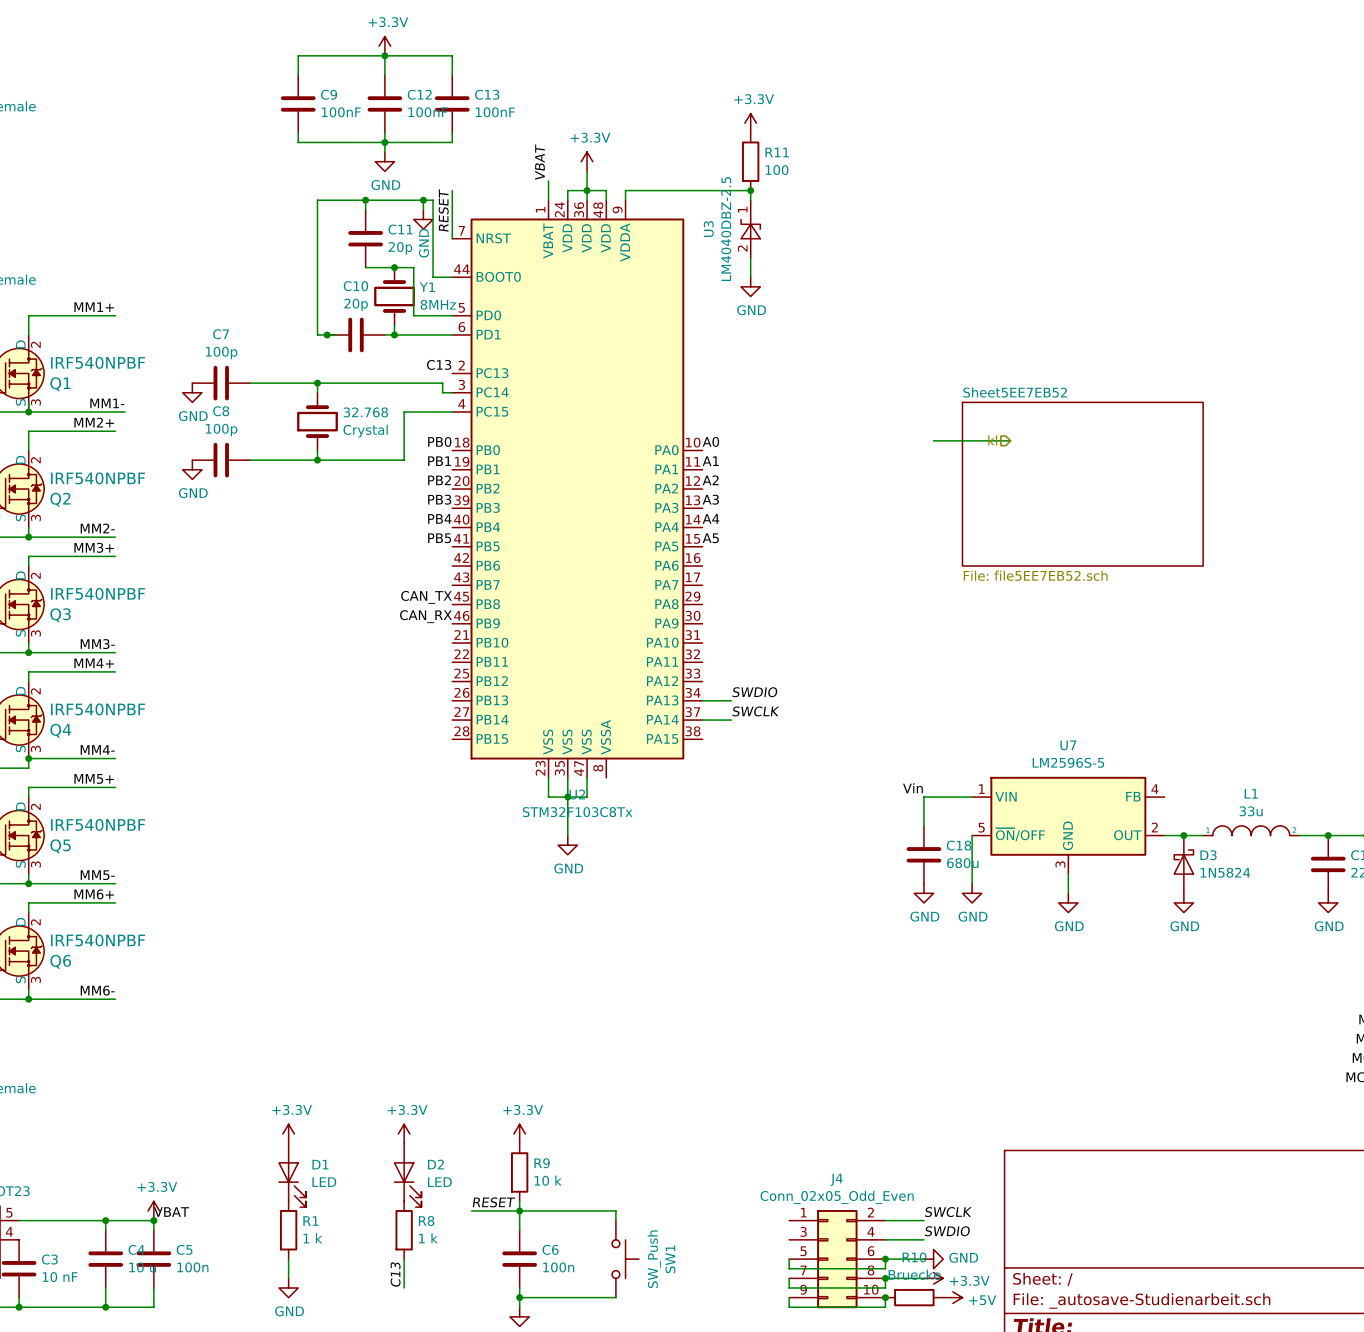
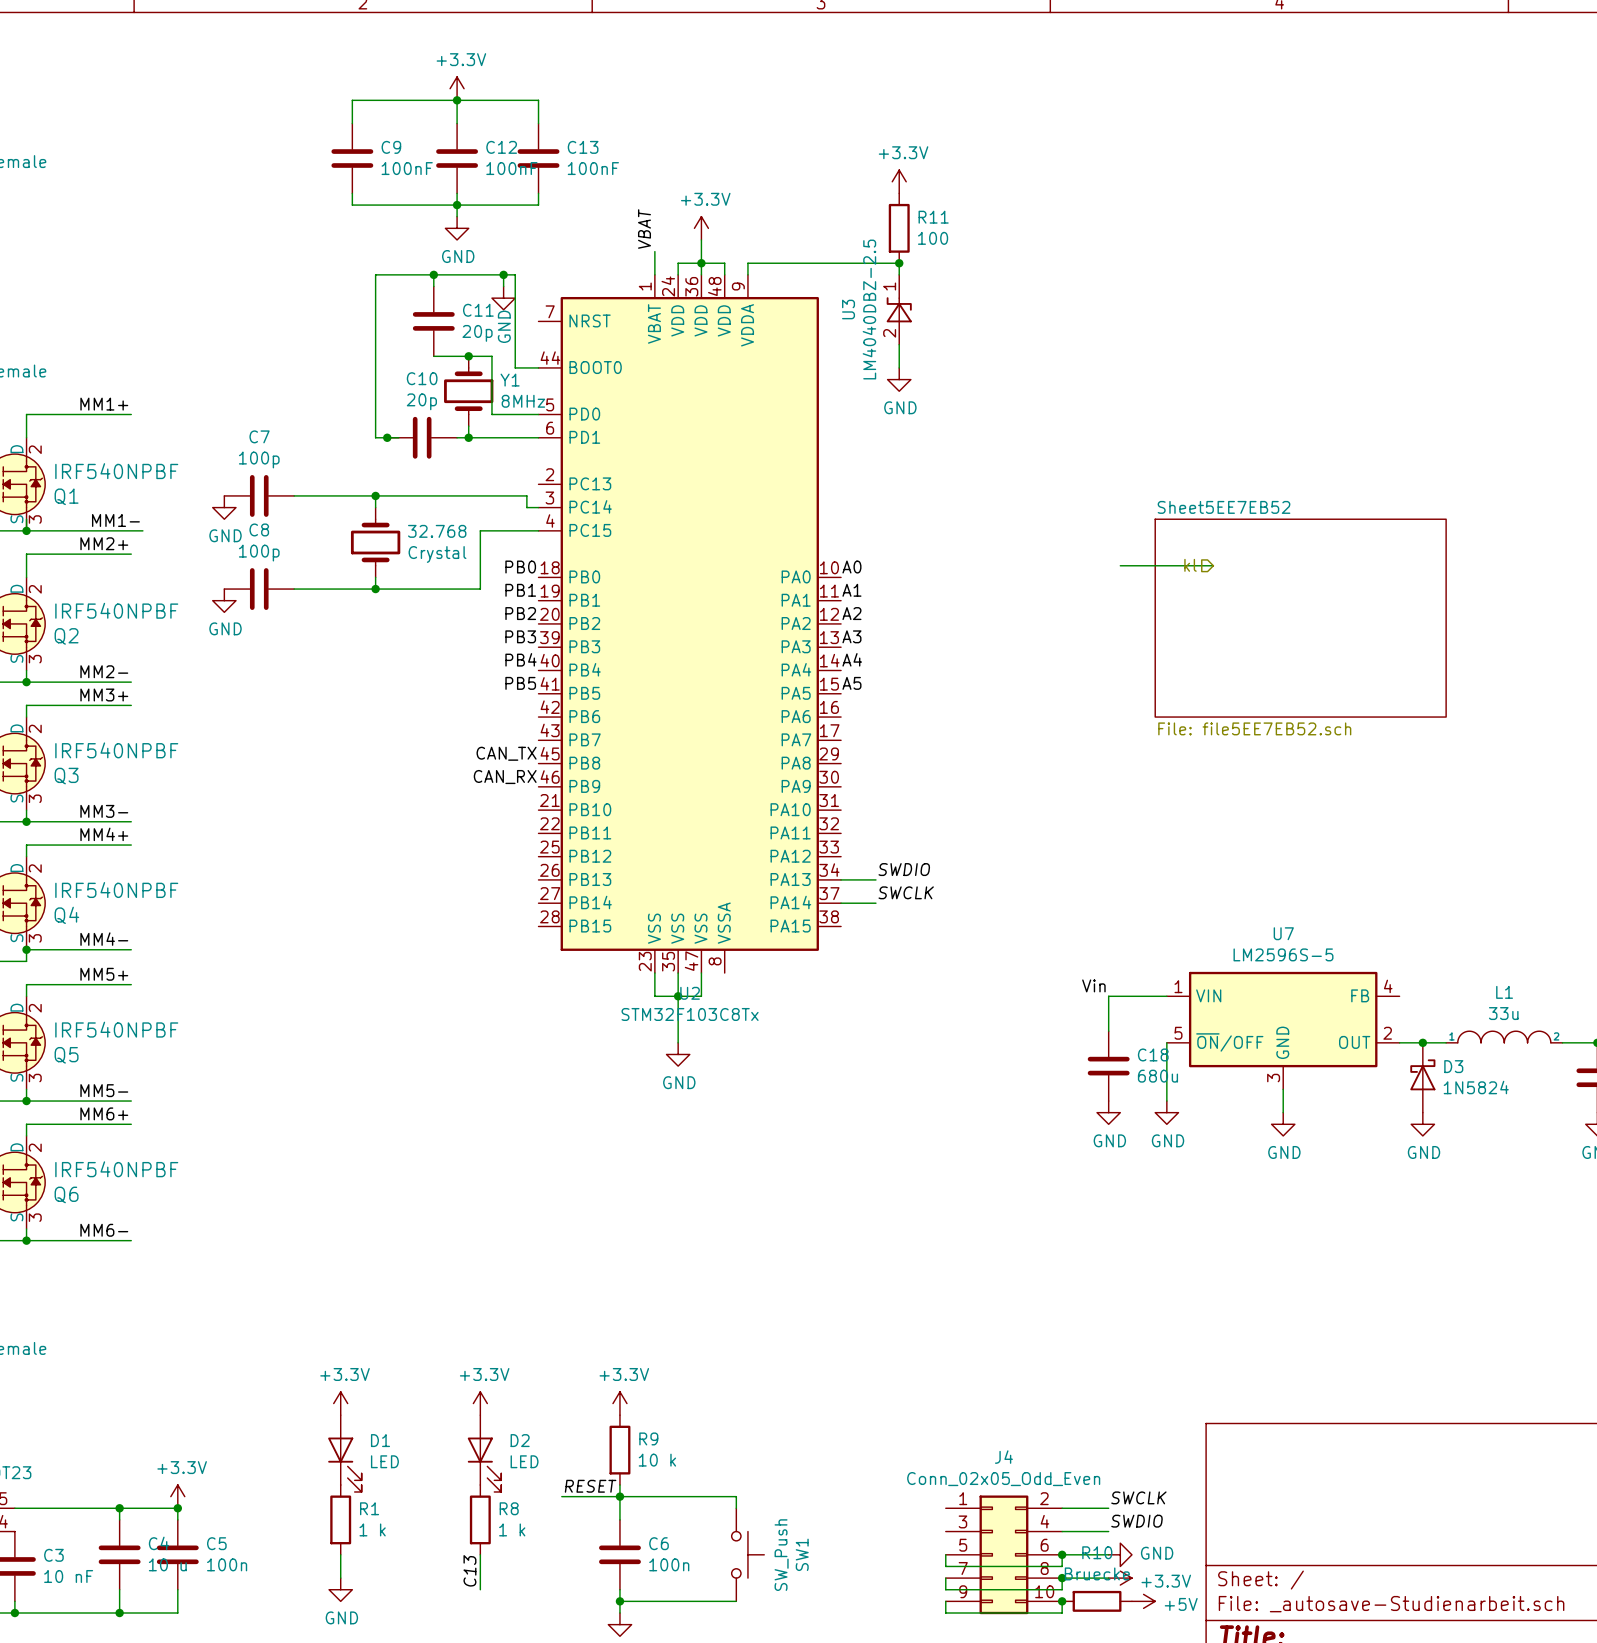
wire: (452, 190) (452, 238) -> none
label: RESET (443, 210) -> none
label: C13 (439, 364) -> none
label: VBAT (171, 1212) -> none

